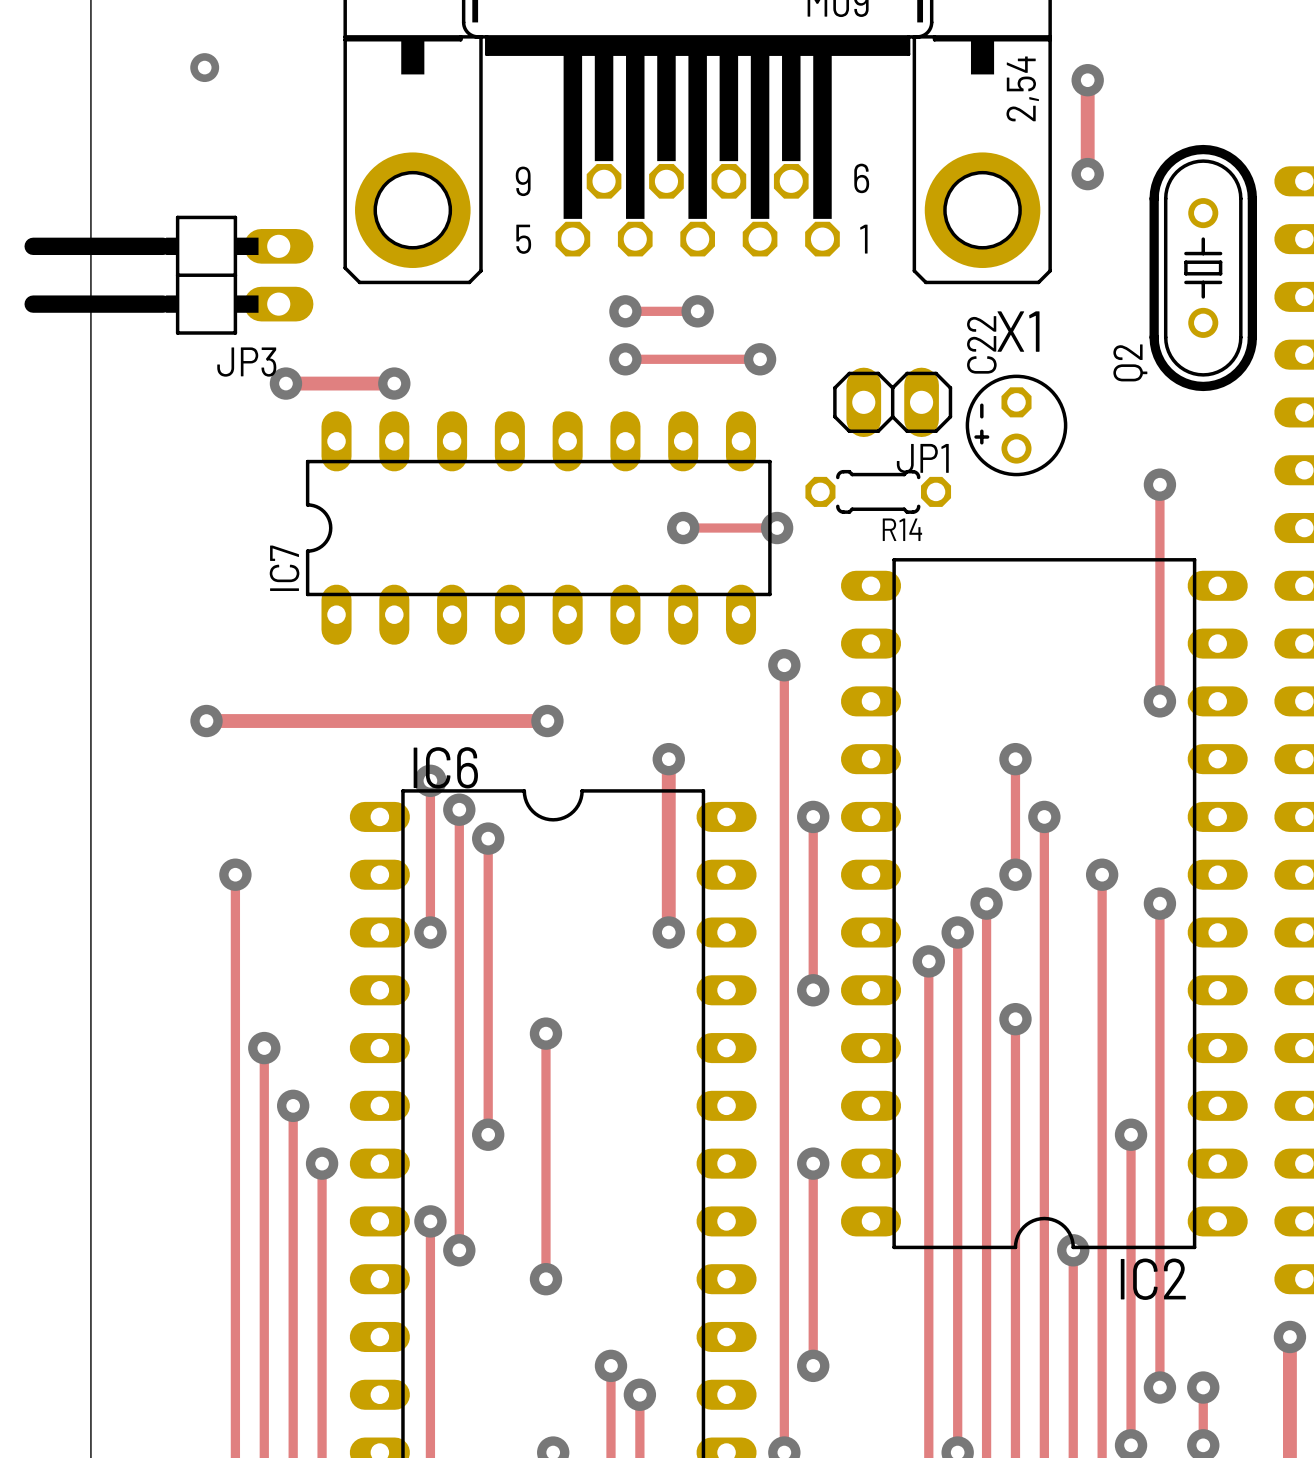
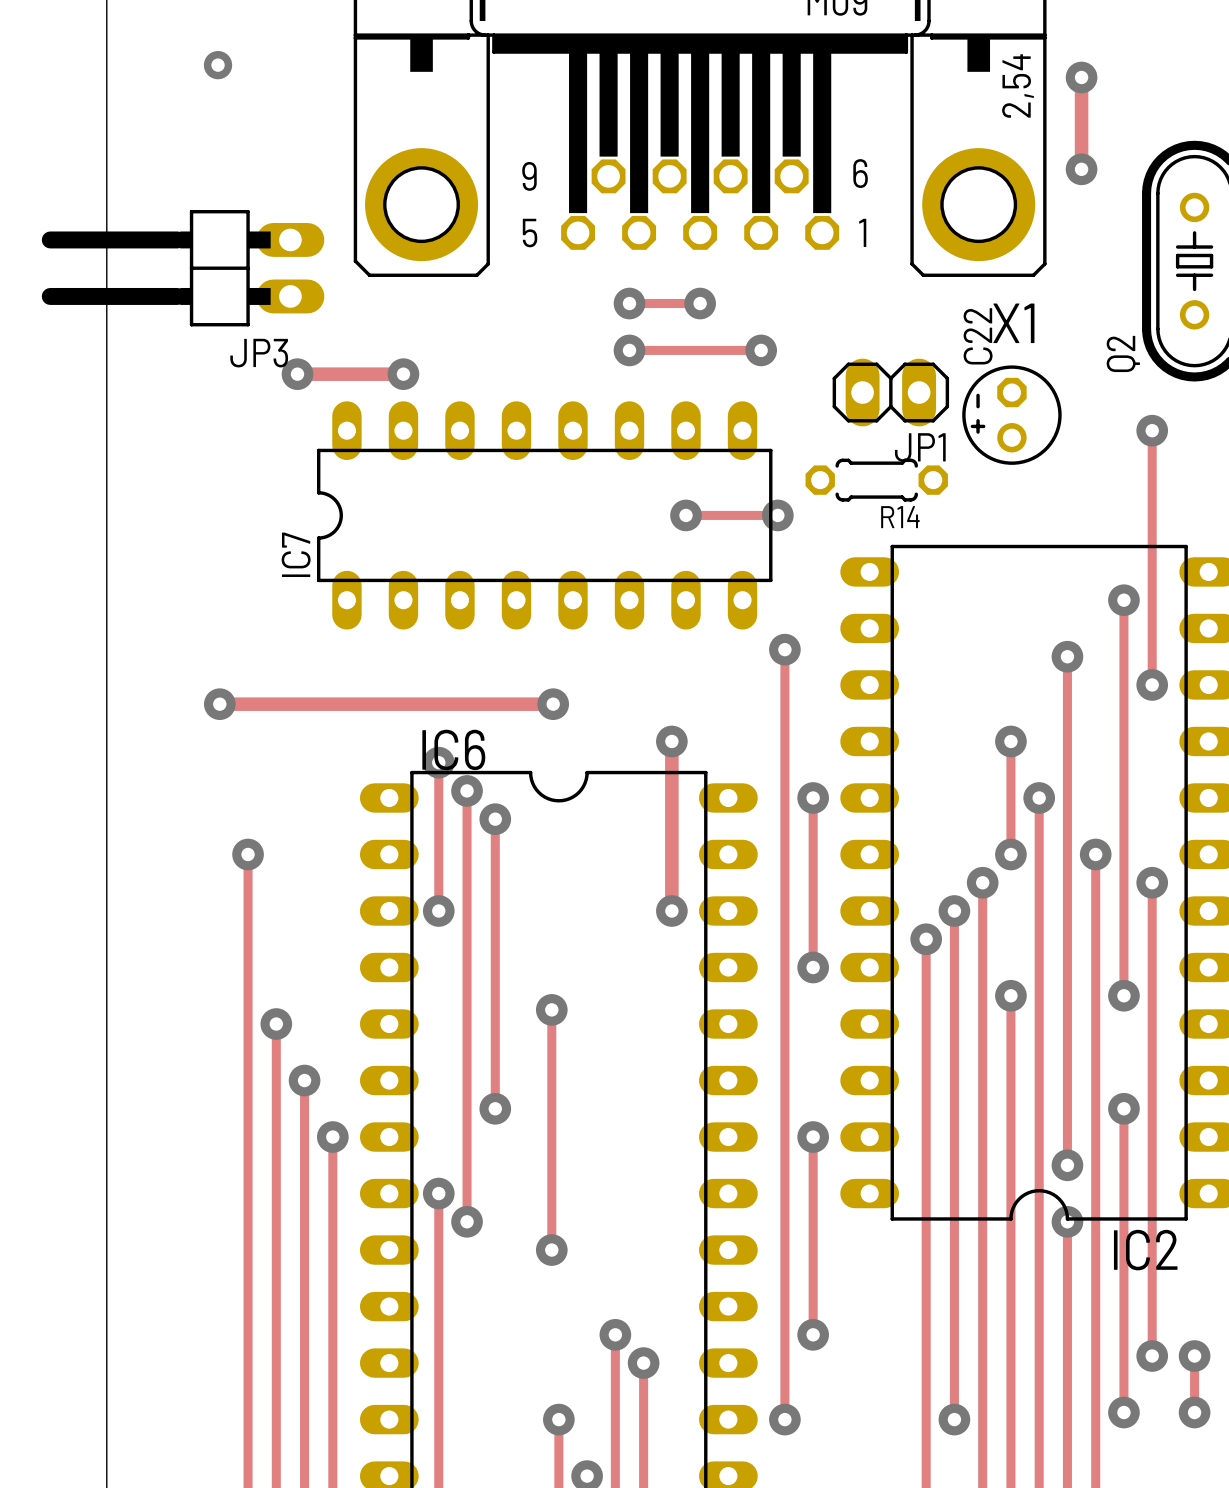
track: none -> (1152, 430) (1152, 473)
via position: (1159, 484) -> (1152, 430)
track: none -> (1123, 600) (1123, 995)
via: none -> (1123, 600)
track: none -> (1067, 656) (1067, 1165)
via: none -> (1067, 656)
via: none -> (1123, 995)
via: none -> (1067, 1165)

